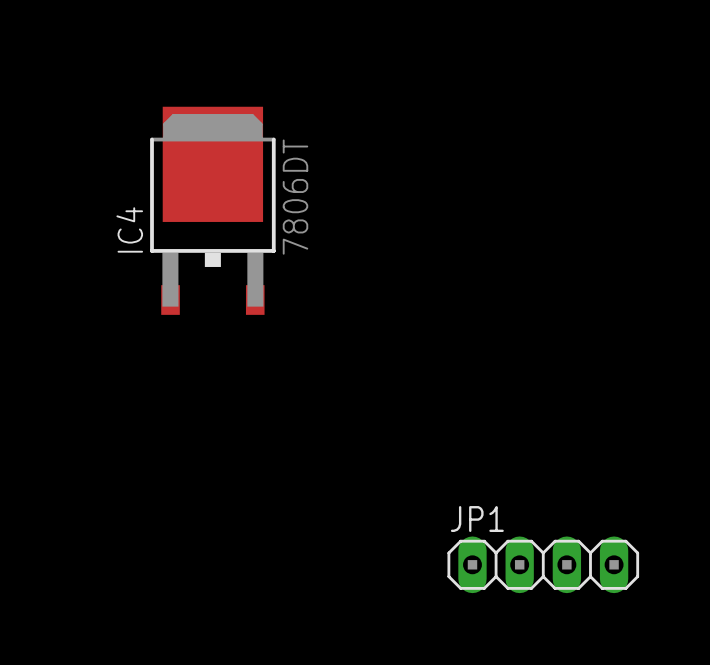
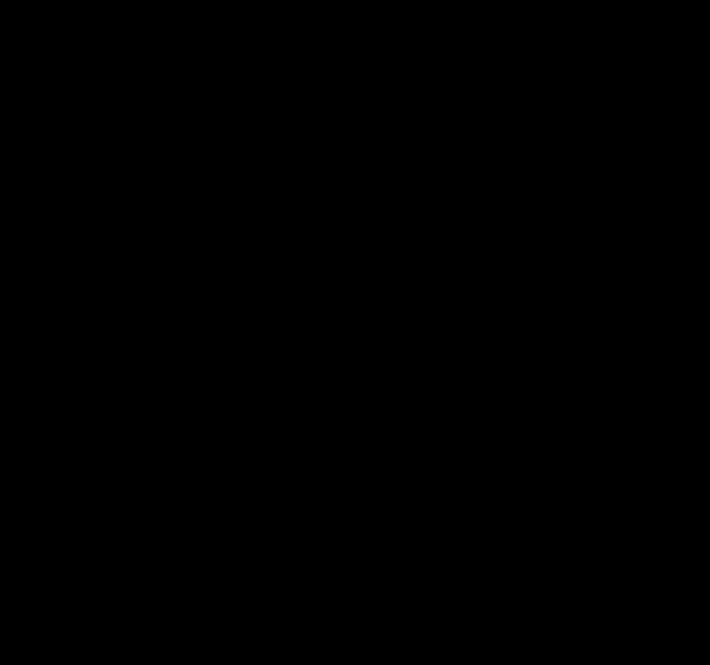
IC4: 7806DT (212, 210) -> none
JP1: (543, 564) -> none

